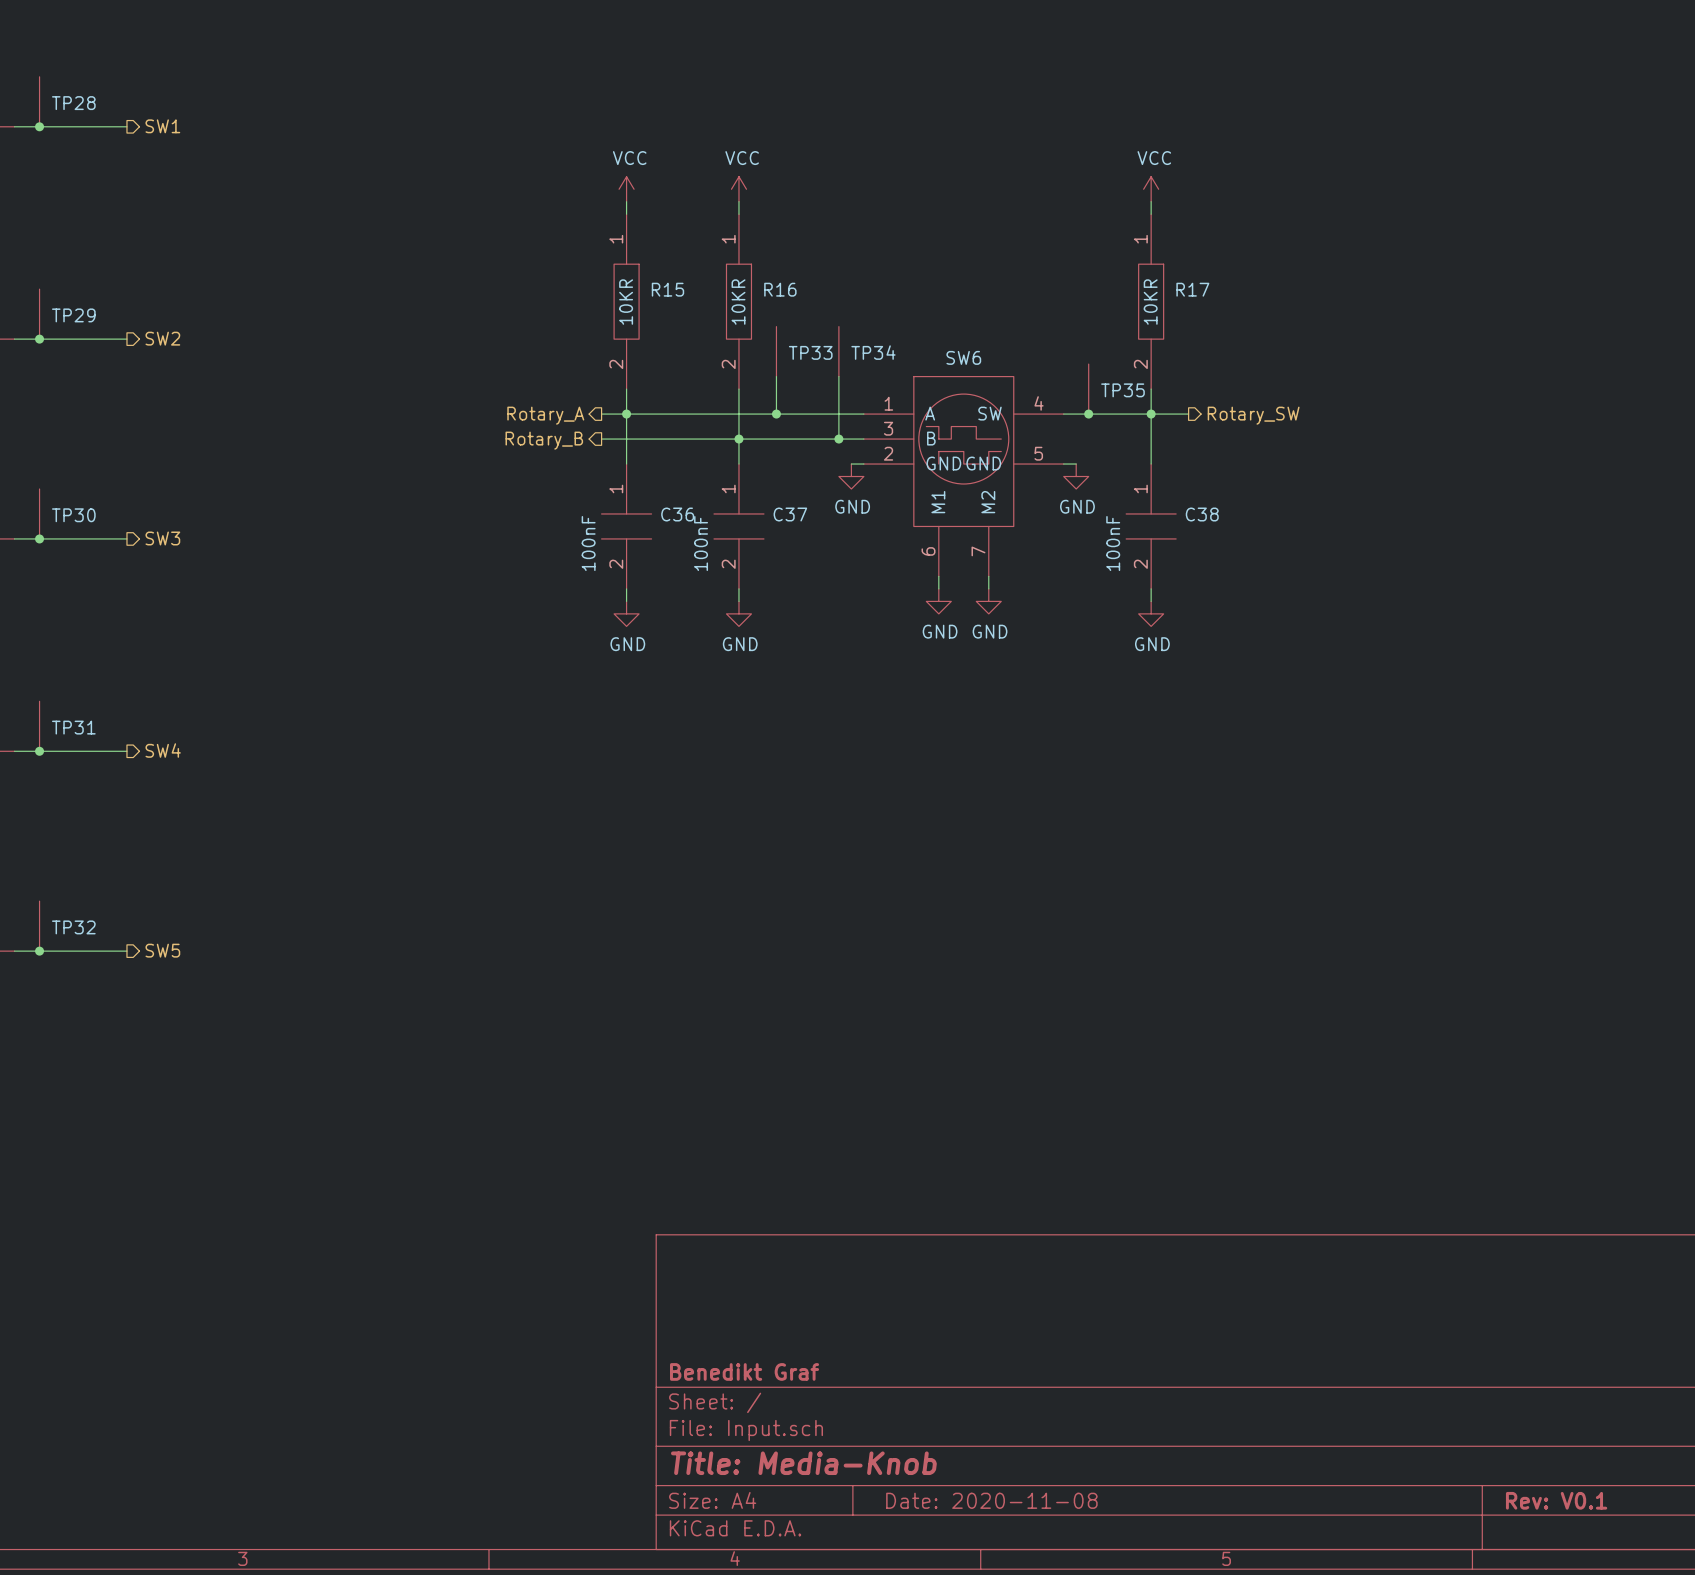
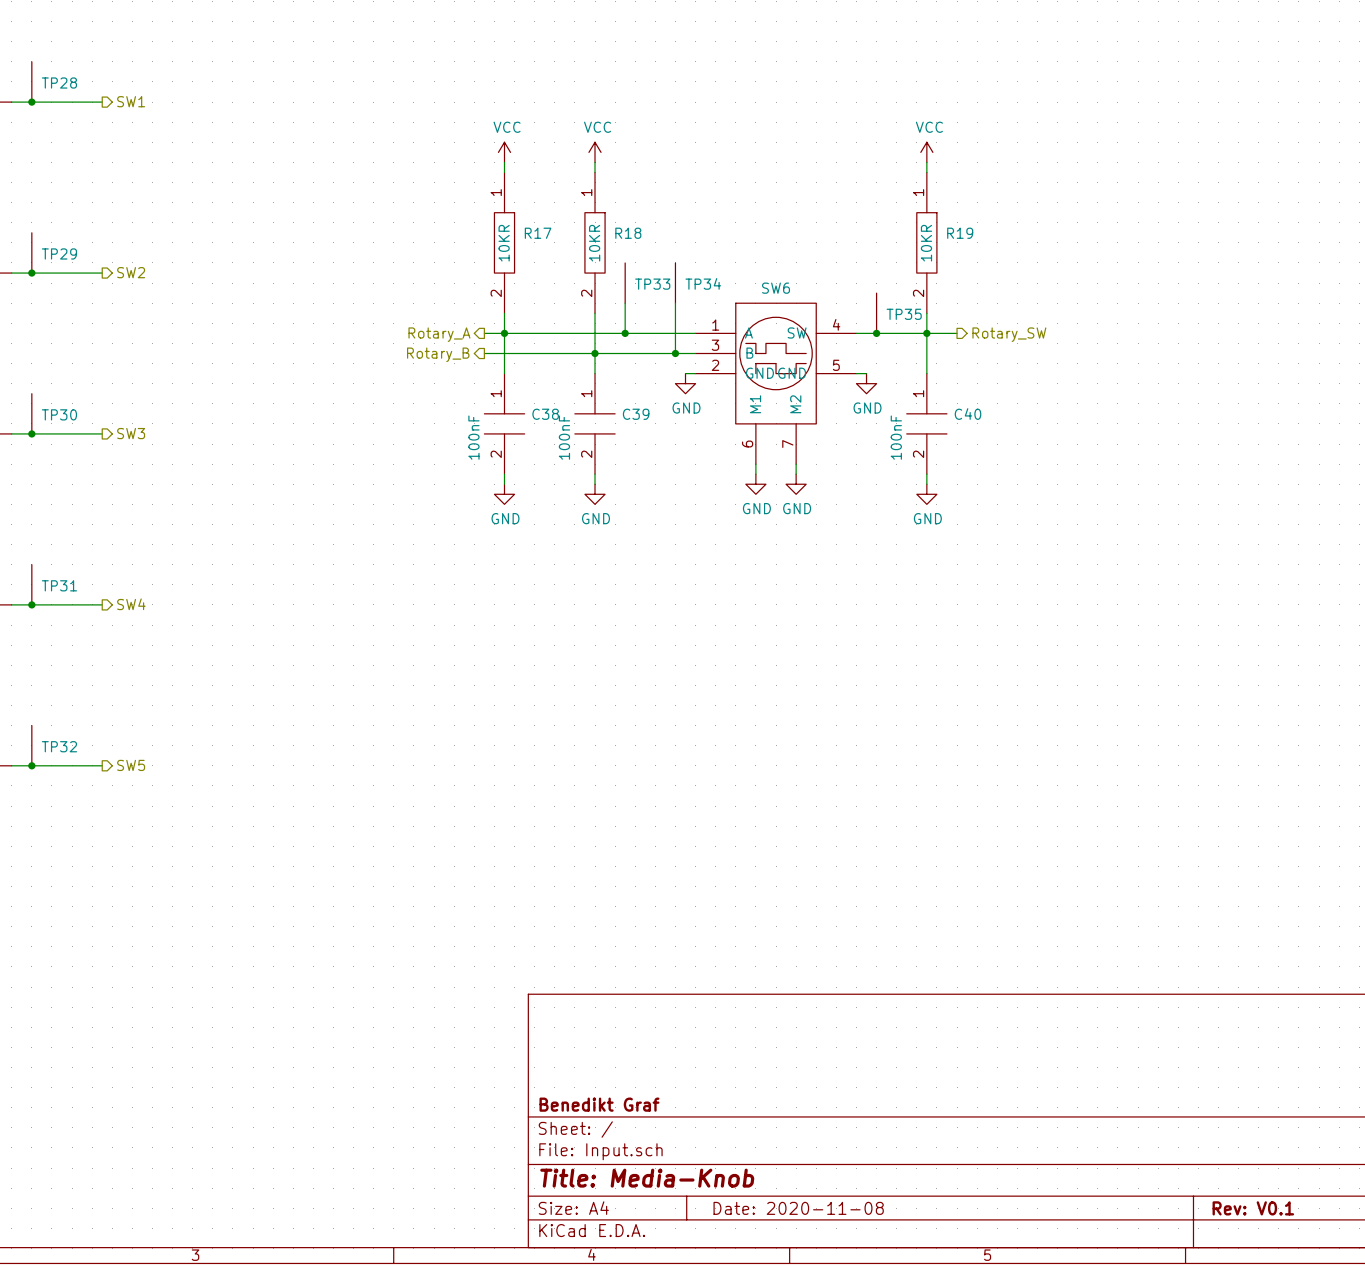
R15 name: R15 (667, 289) -> R17 (538, 233)
R16 name: R16 (780, 289) -> R18 (628, 233)
R17 name: R17 (1192, 289) -> R19 (960, 233)
C36 name: C36 (677, 514) -> C38 (545, 414)
C37 name: C37 (790, 514) -> C39 (636, 414)
C38 name: C38 (1202, 514) -> C40 (968, 414)

